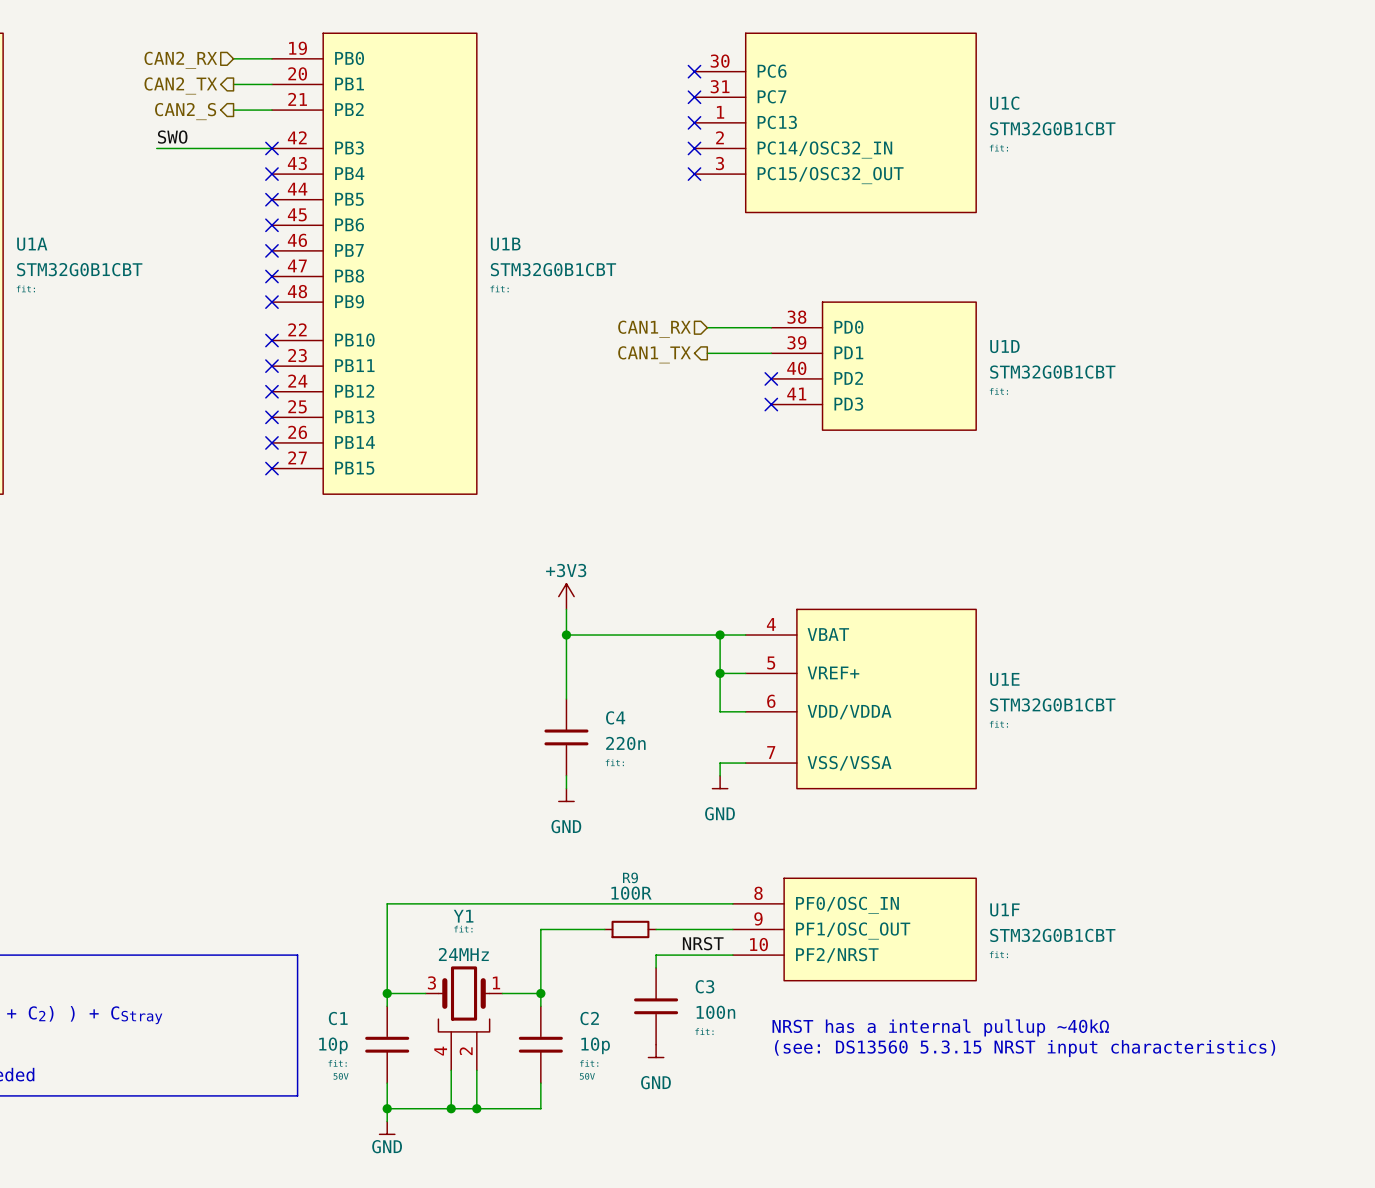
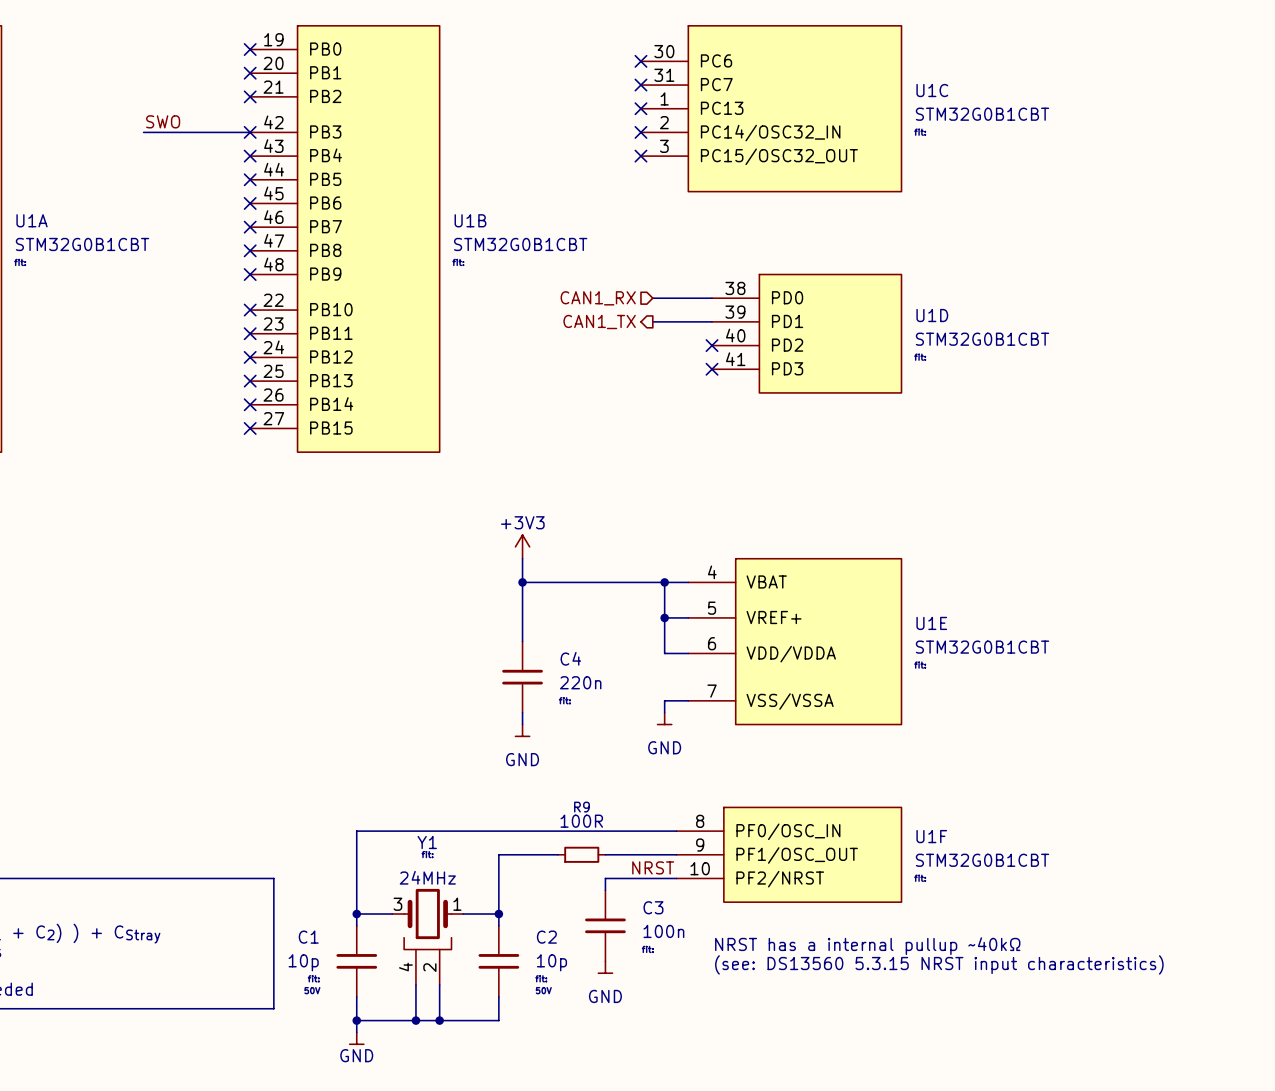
wire: (233, 58) (271, 58) -> none
no-connect mark: none -> (250, 49)
hierarchical label: CAN2_RX (180, 60) -> none
wire: (233, 84) (271, 84) -> none
no-connect mark: none -> (250, 73)
hierarchical label: CAN2_TX (180, 85) -> none
wire: (233, 110) (271, 110) -> none
no-connect mark: none -> (250, 96)
hierarchical label: CAN2_S (185, 111) -> none

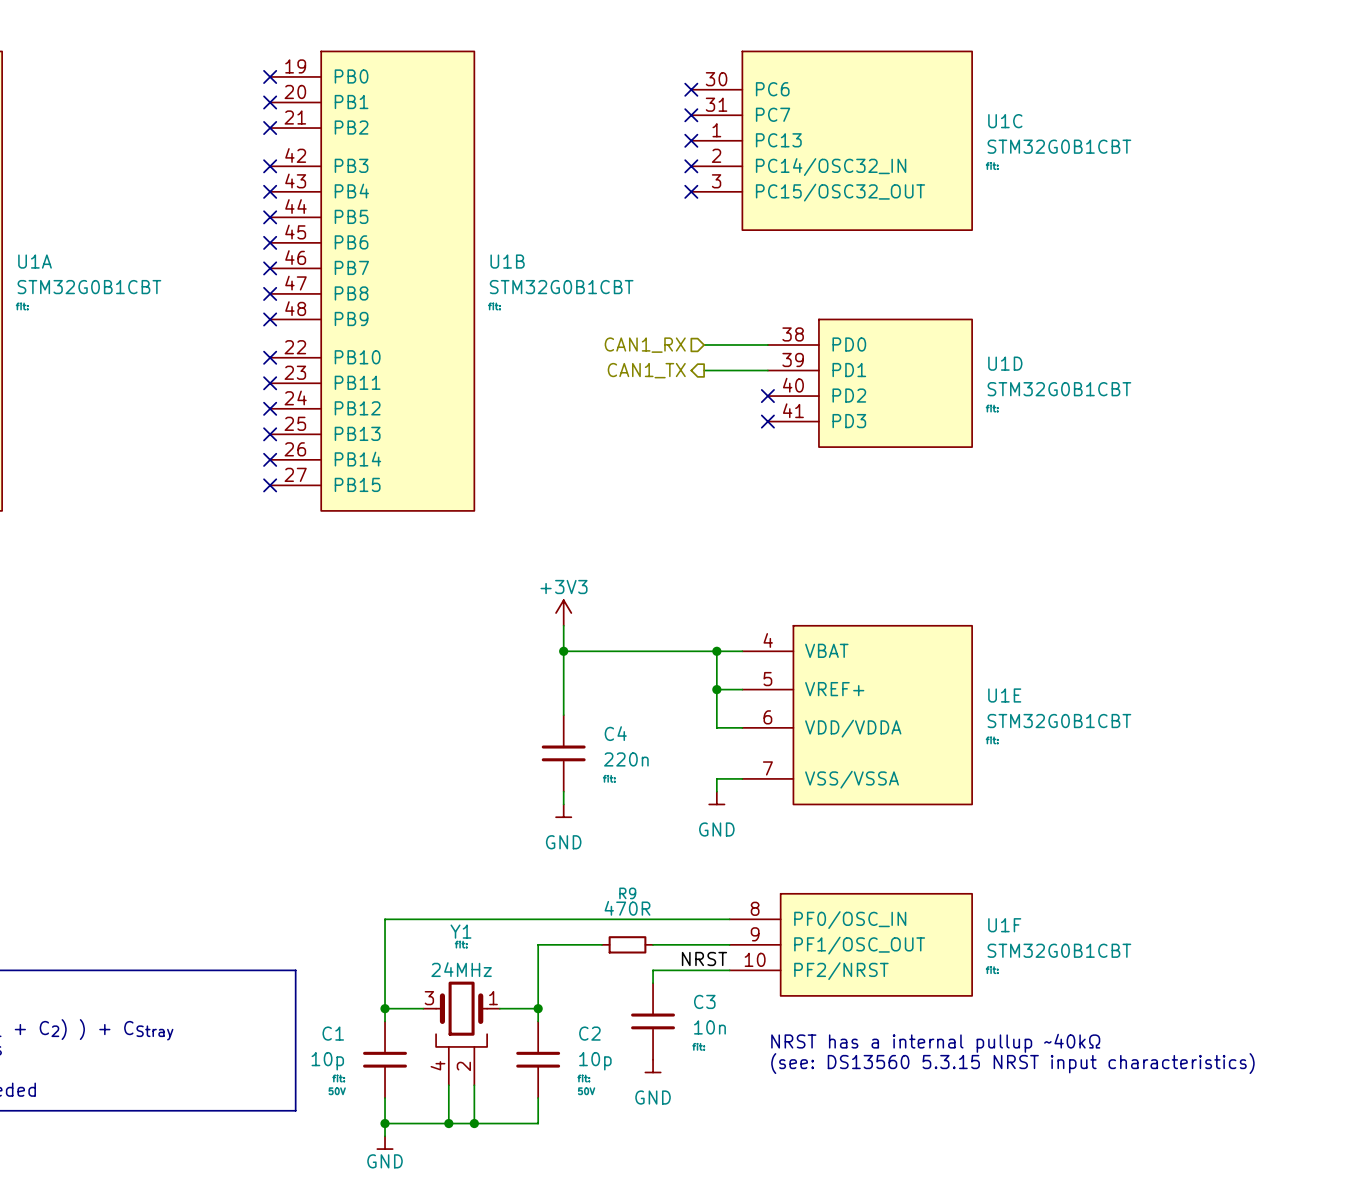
label: SWO (163, 121) -> none
wire: (143, 132) (250, 132) -> none
R9 value: 100R (581, 821) -> 470R (627, 908)
C3 value: 100n (663, 931) -> 10n (709, 1027)

